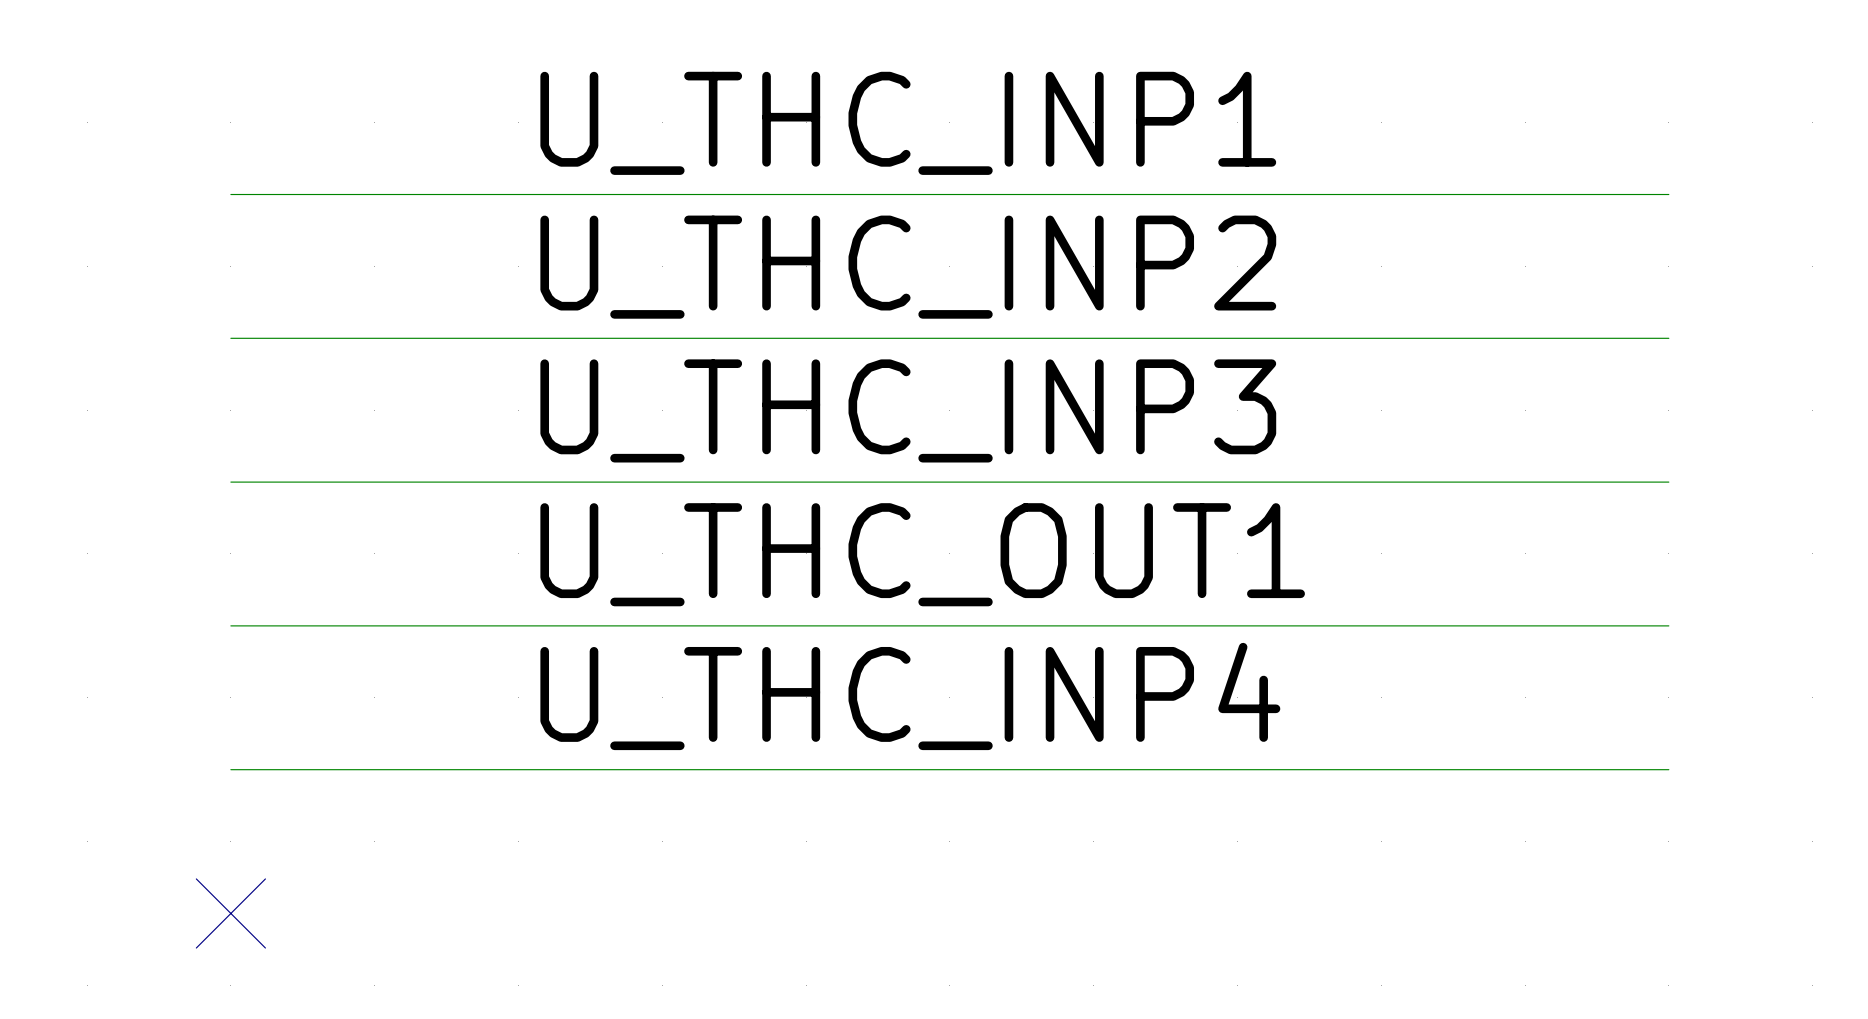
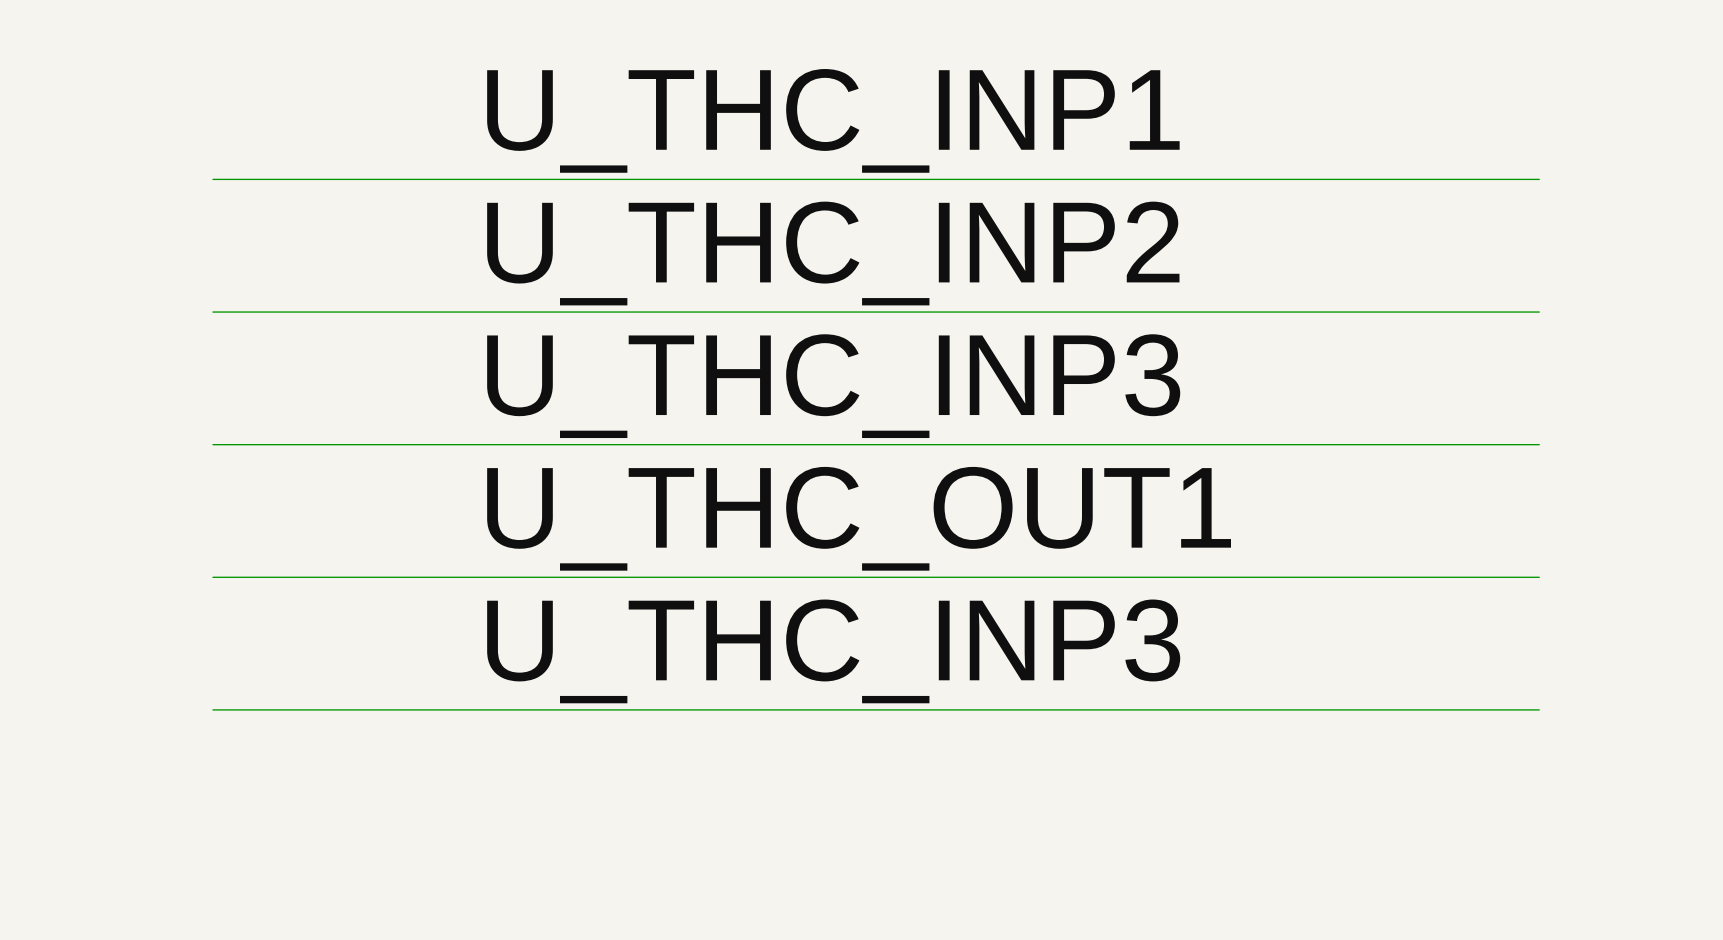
label: U_THC_INP4 (910, 696) -> U_THC_INP3 (833, 651)
no-connect mark: (230, 913) -> none

